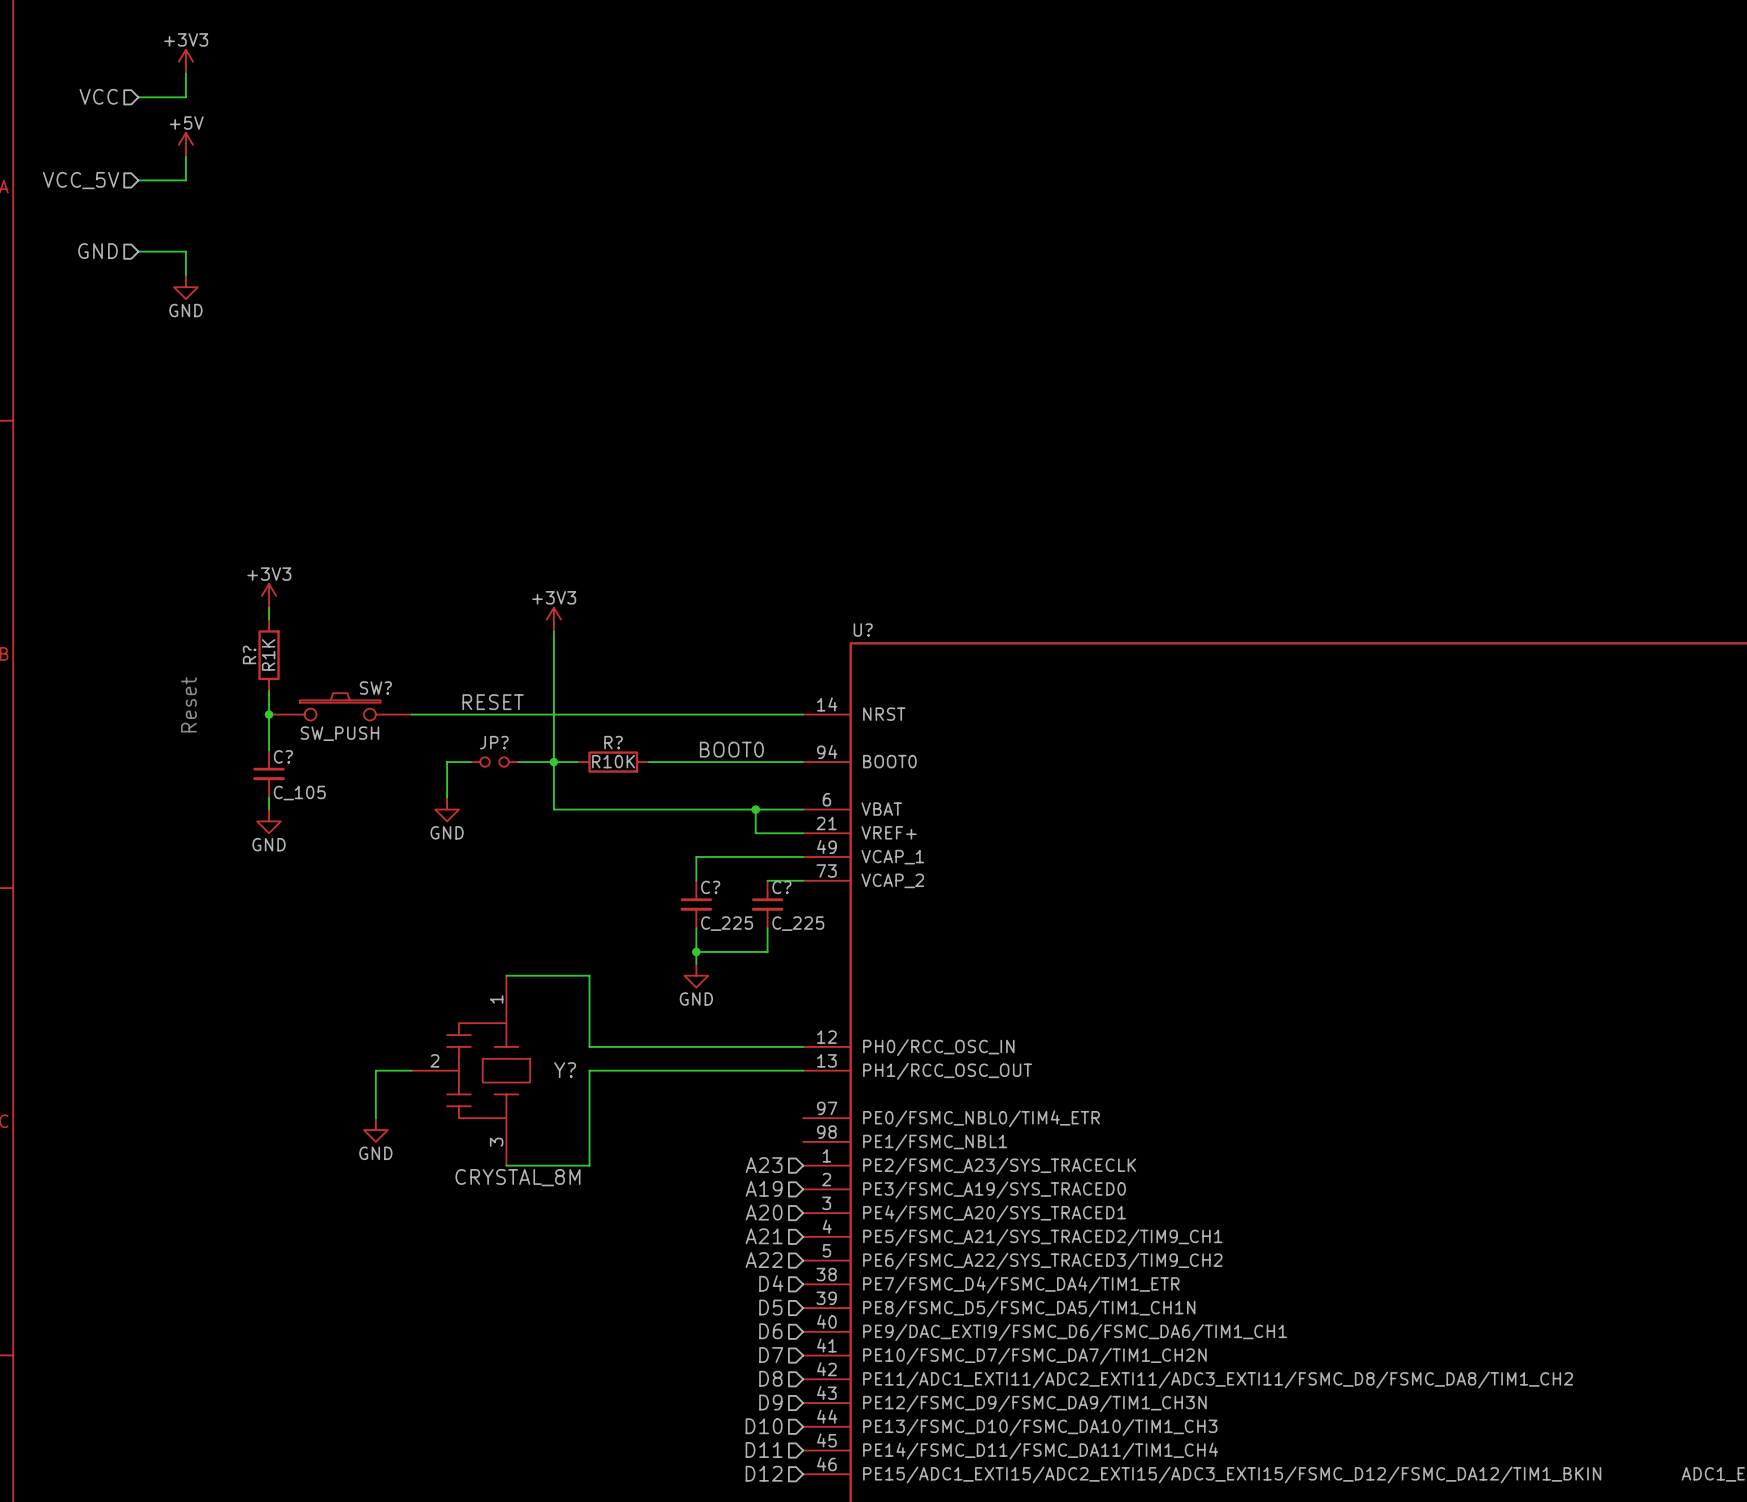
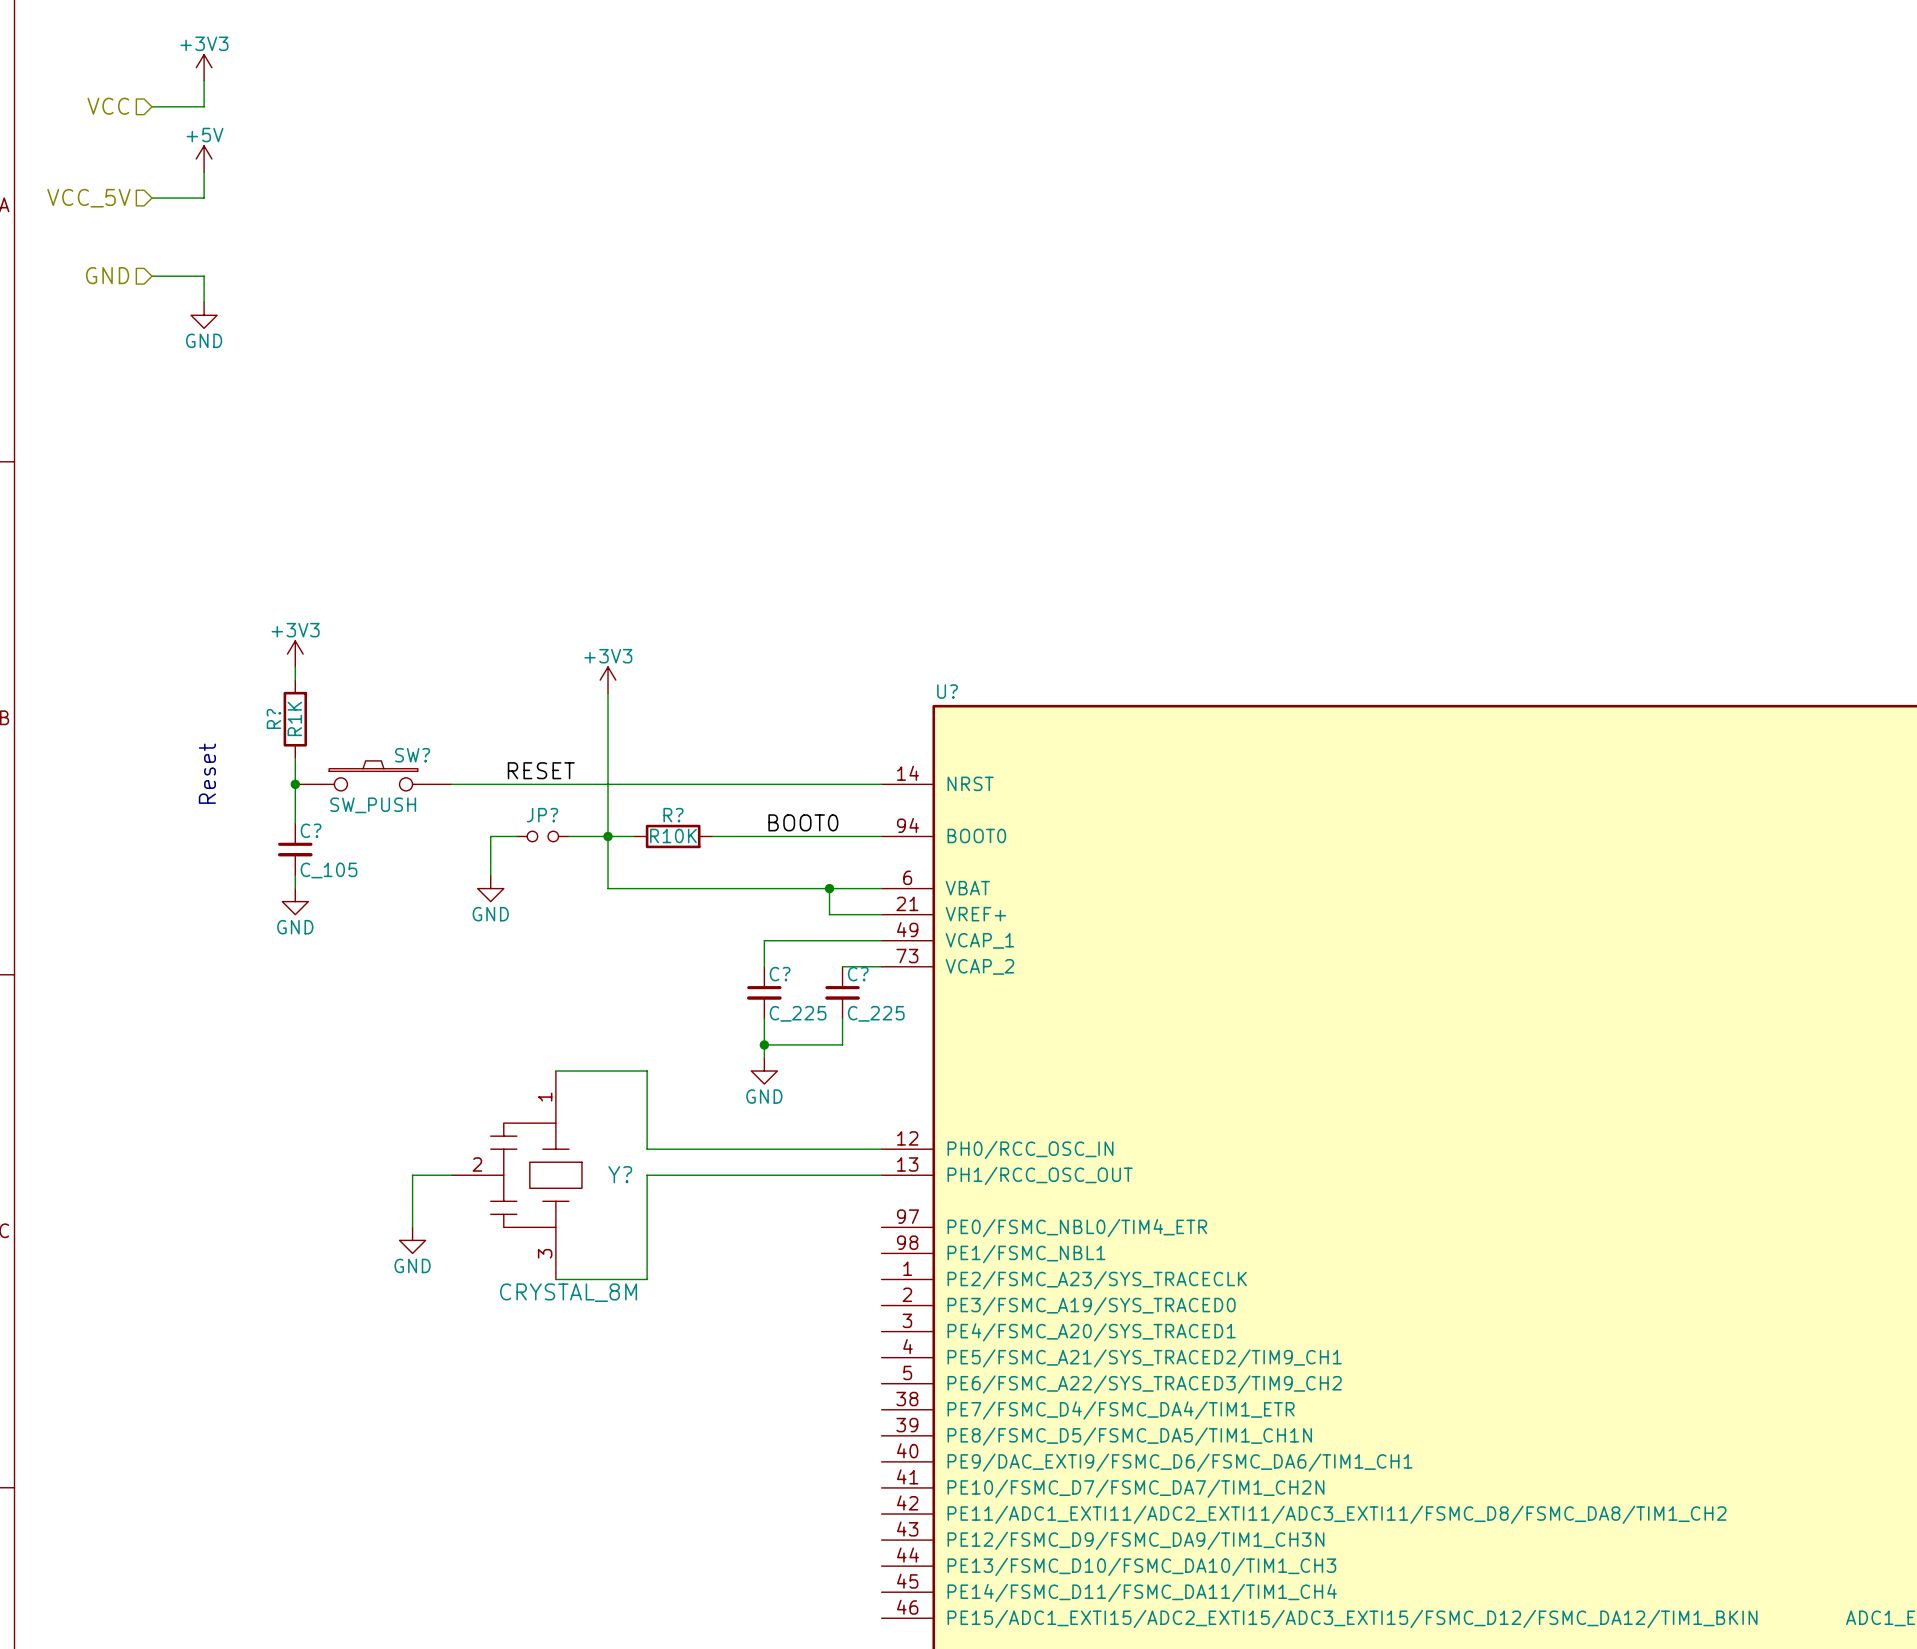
hierarchical label: A23 (764, 1165) -> none
hierarchical label: A19 (764, 1188) -> none
hierarchical label: A20 (764, 1212) -> none
hierarchical label: A21 (764, 1236) -> none
hierarchical label: A22 (764, 1260) -> none
hierarchical label: D4 (771, 1283) -> none
hierarchical label: D5 (770, 1307) -> none
hierarchical label: D6 (770, 1331) -> none
hierarchical label: D7 (771, 1355) -> none
hierarchical label: D8 (770, 1378) -> none
hierarchical label: D9 (770, 1402) -> none
hierarchical label: D10 (764, 1426) -> none
hierarchical label: D11 (764, 1449) -> none
hierarchical label: D12 (764, 1473) -> none

